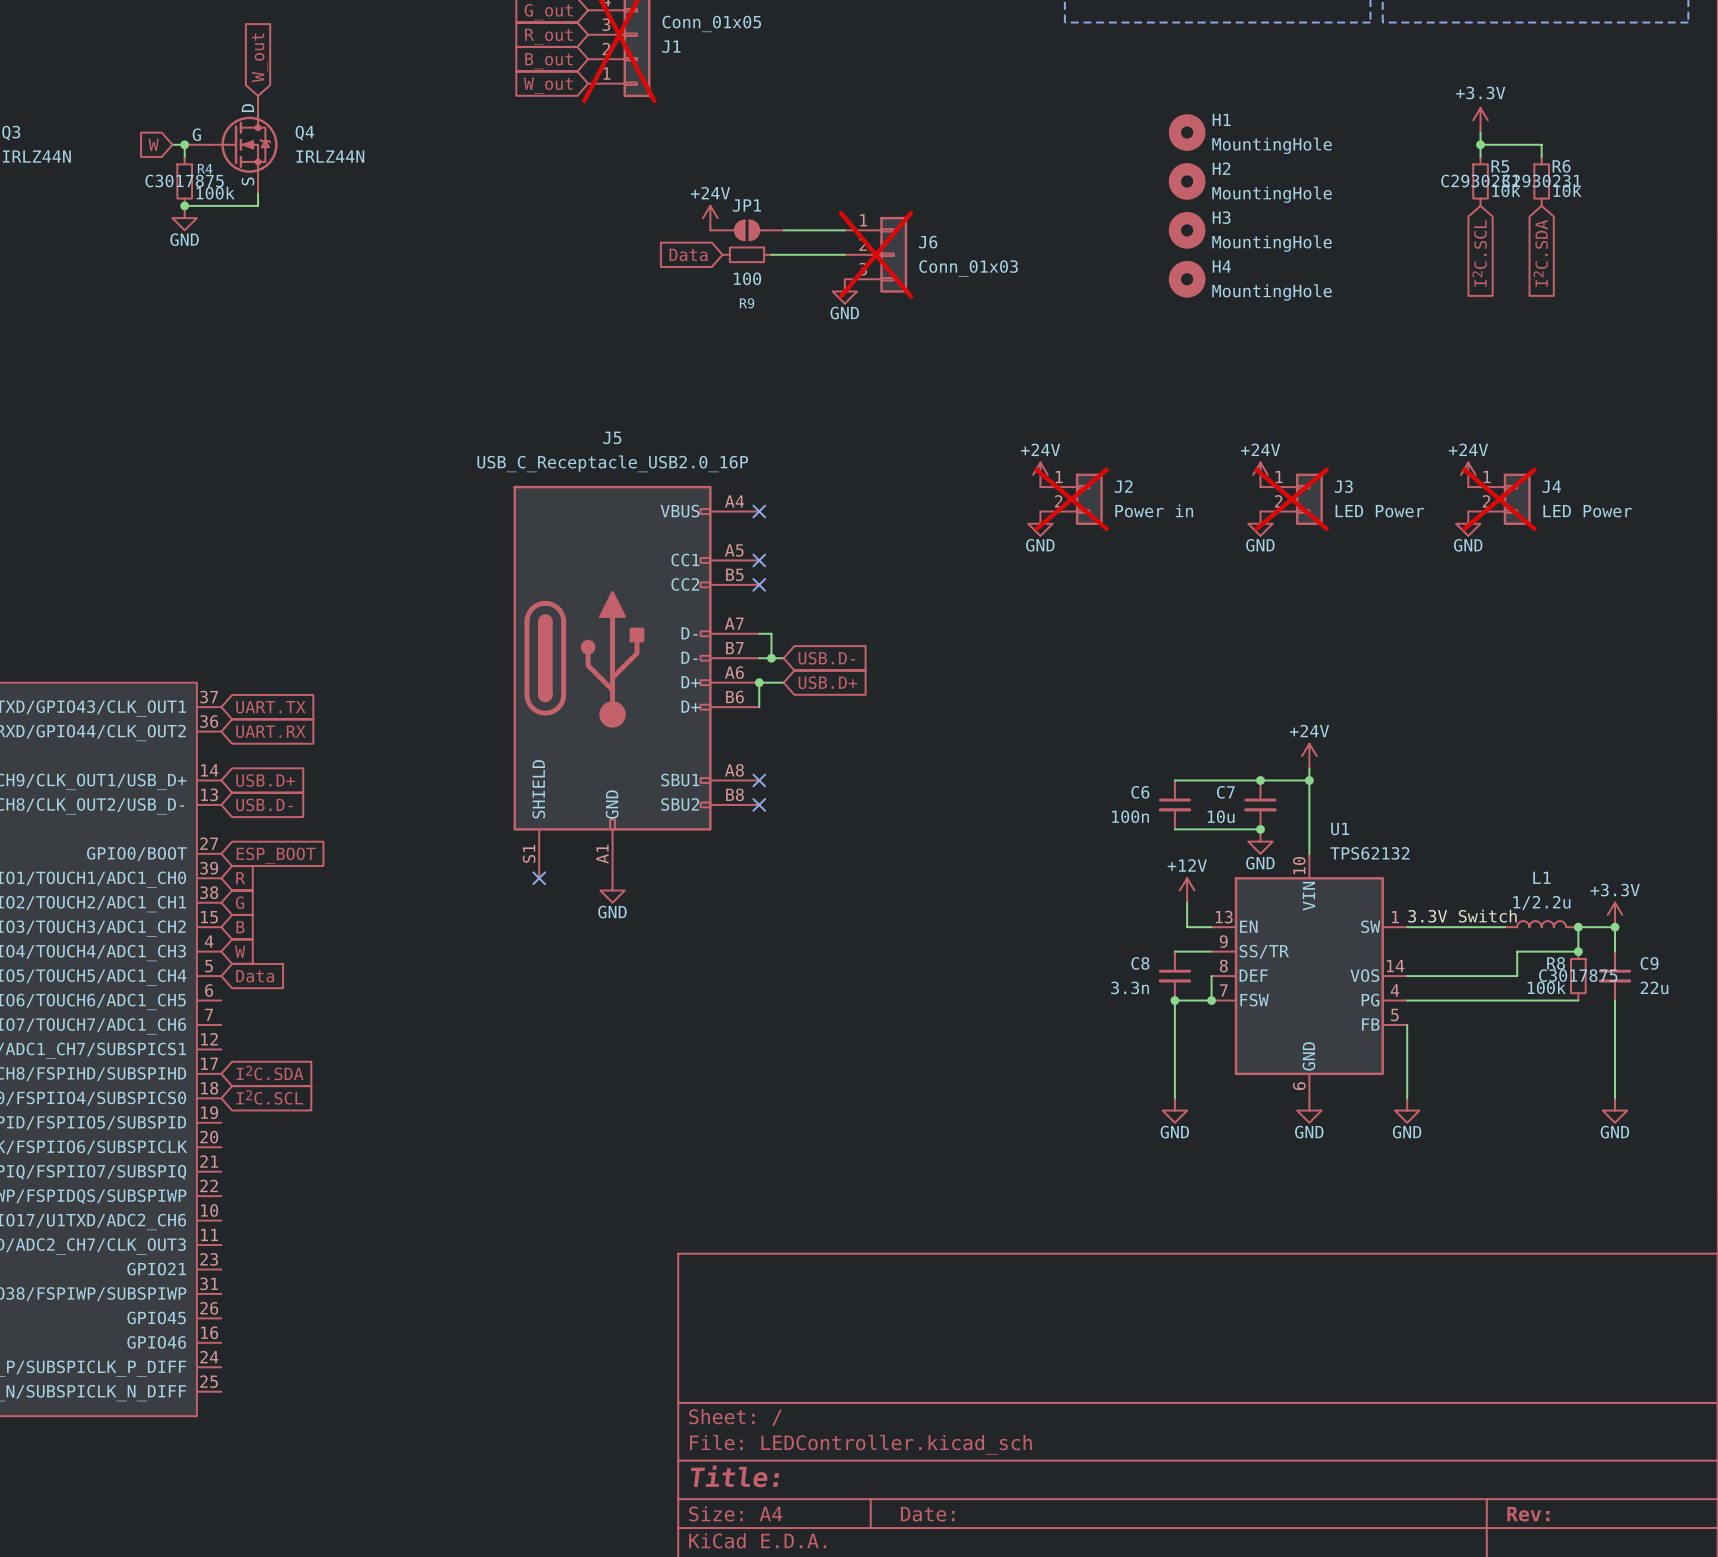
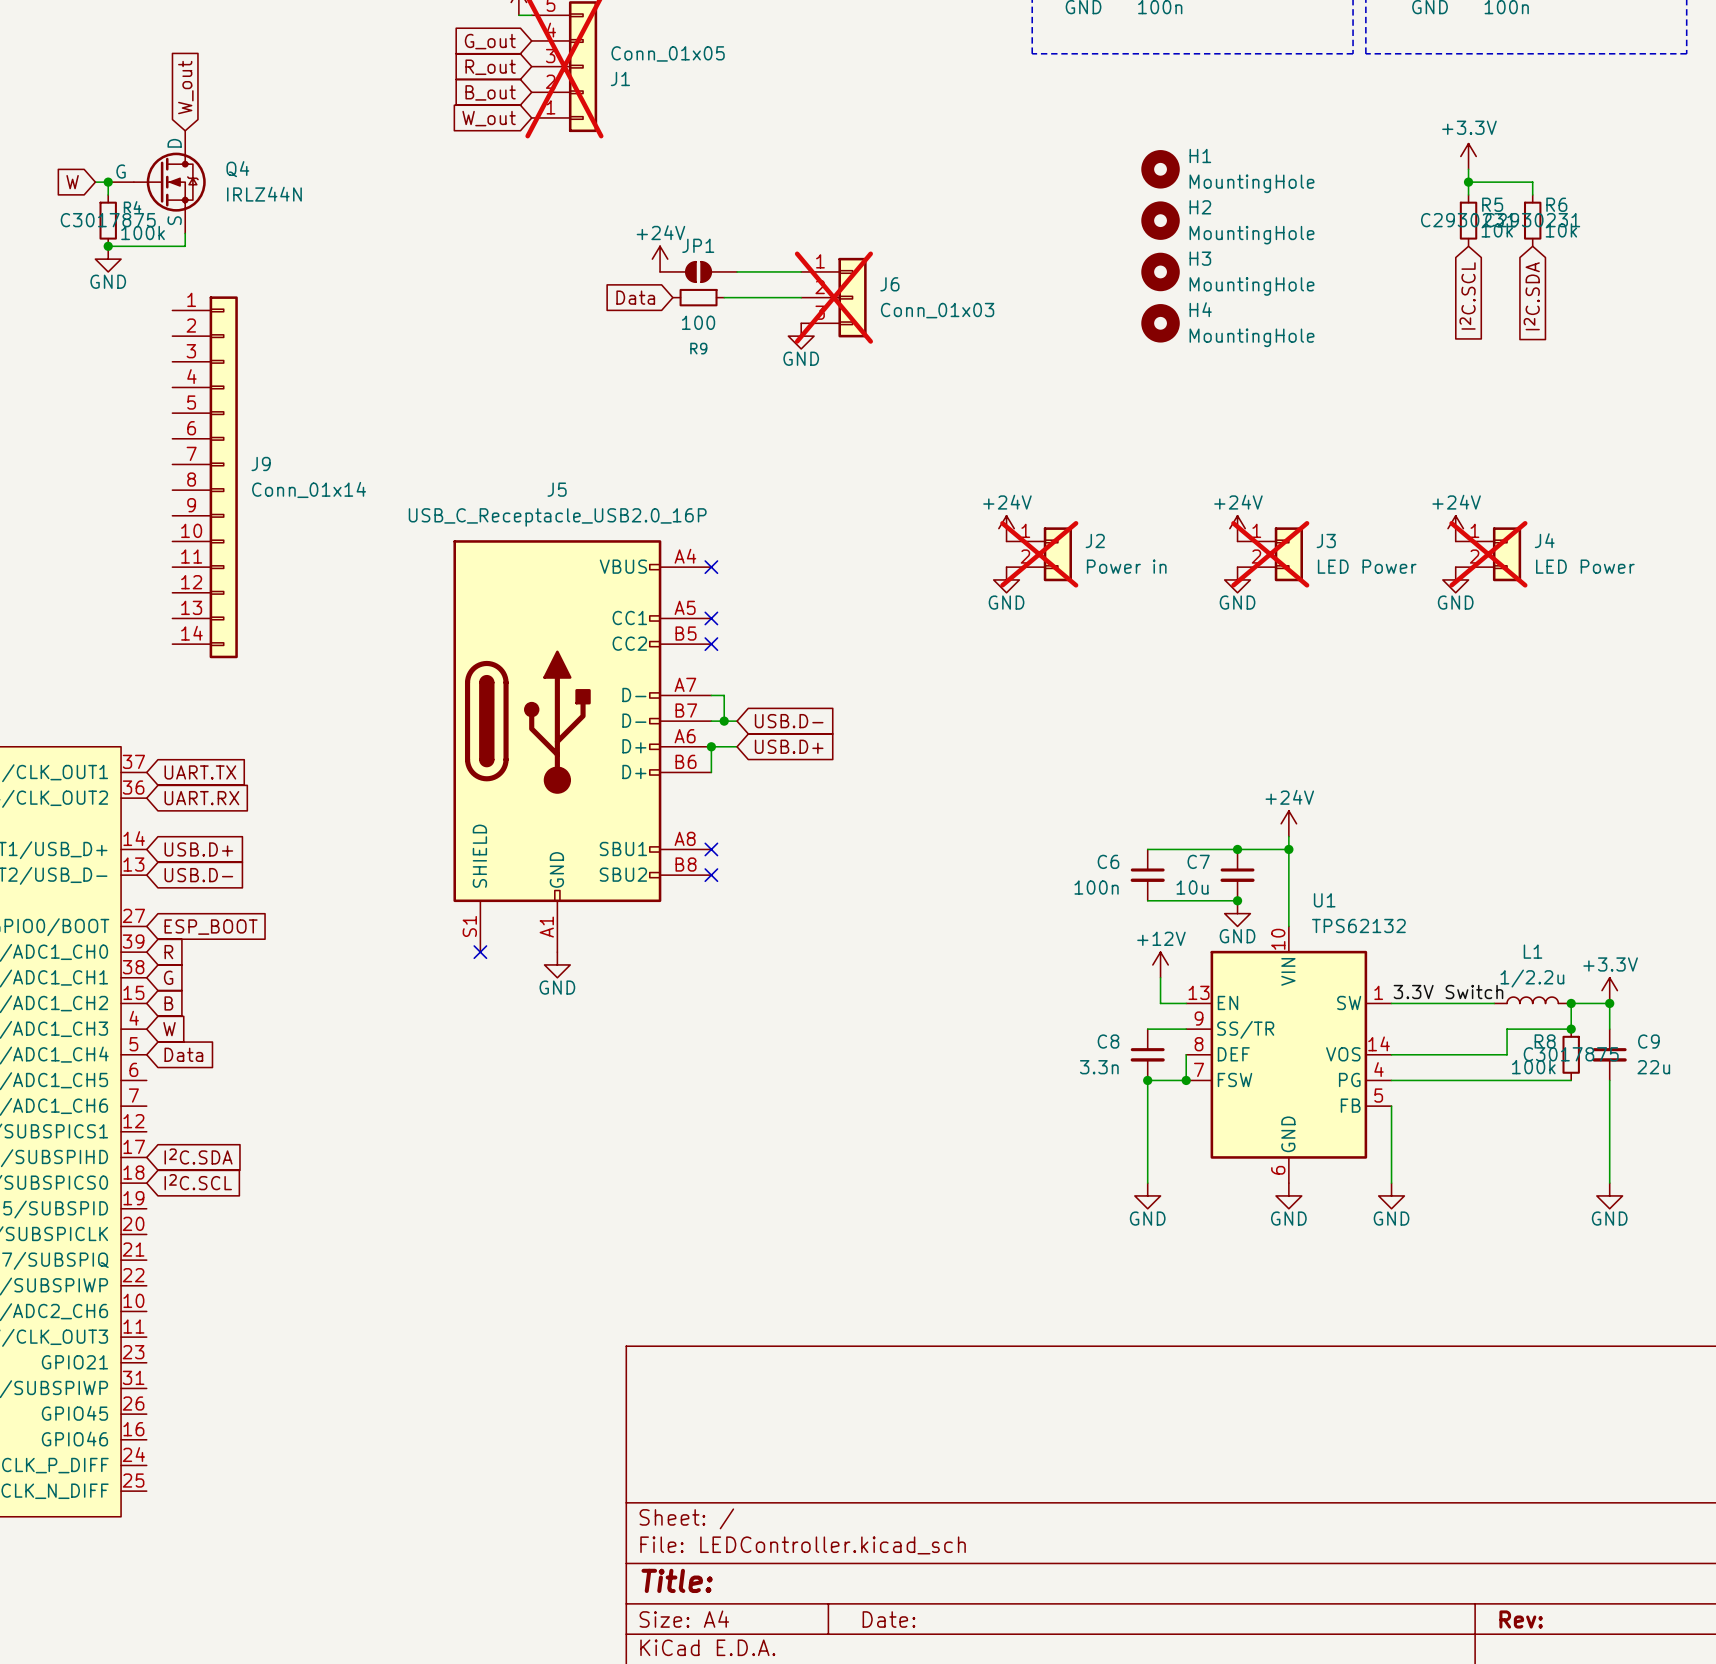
J9: none -> Conn_01x14 (205, 477)

